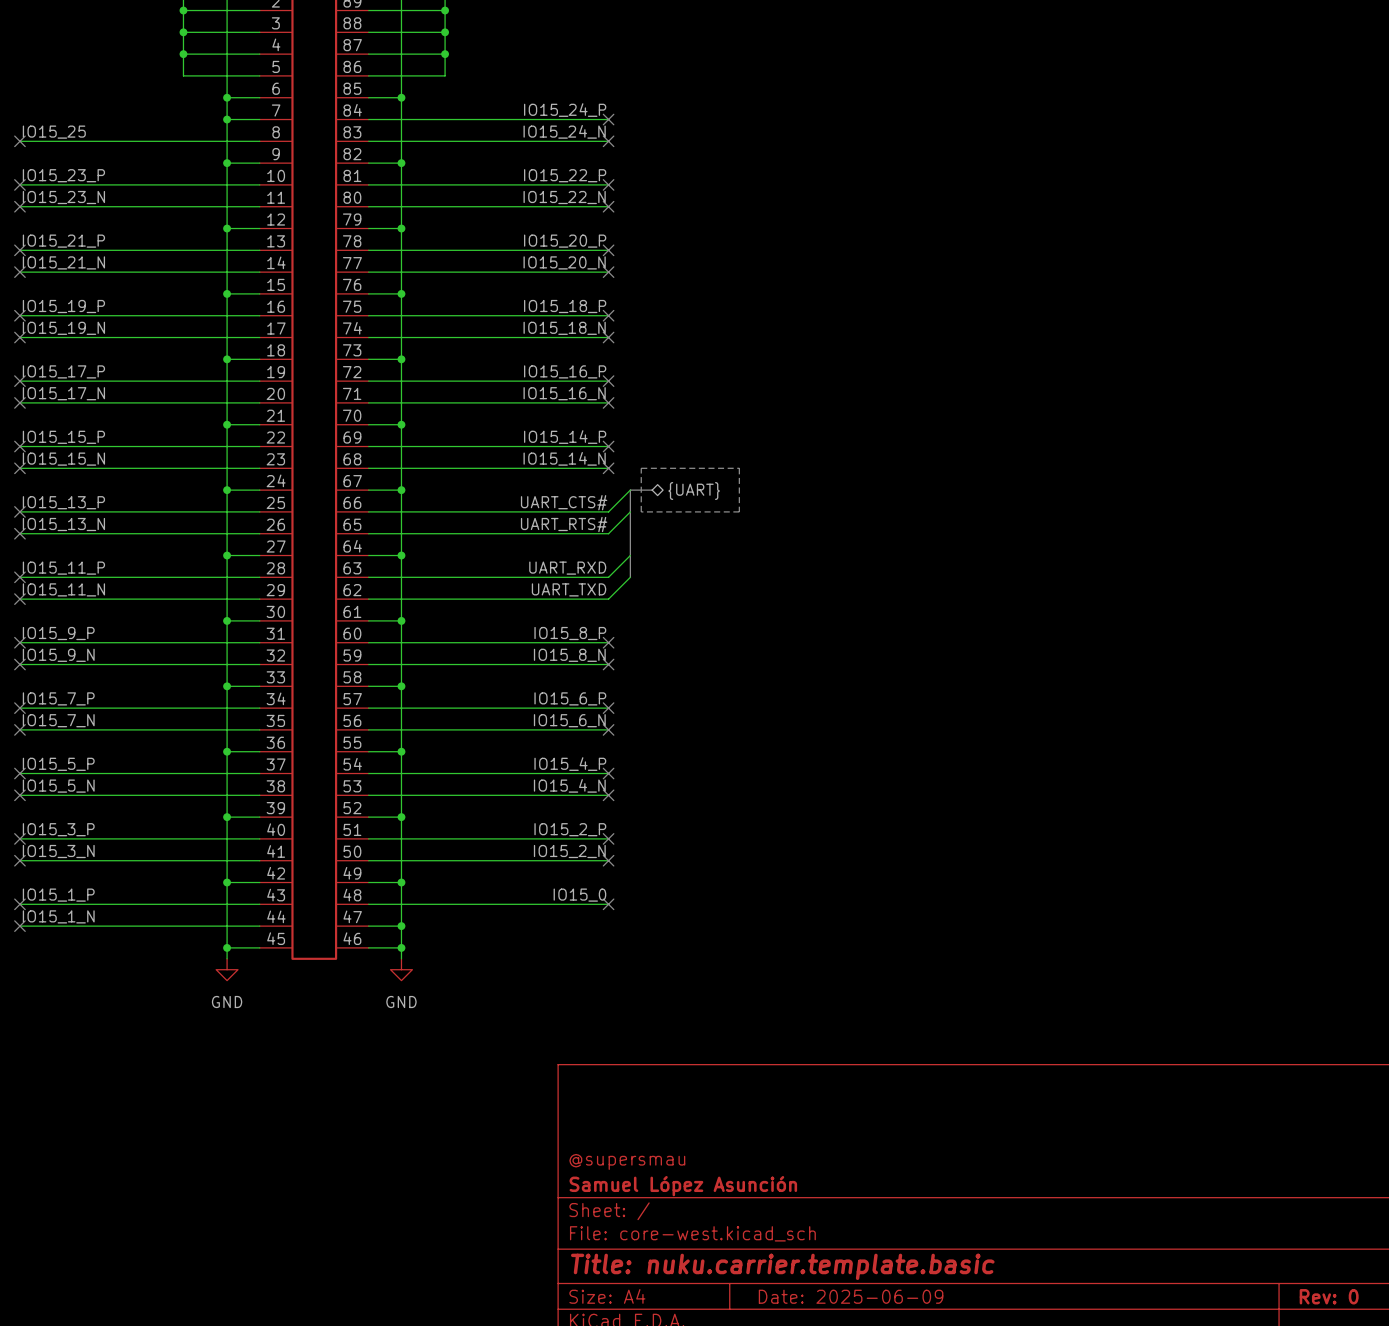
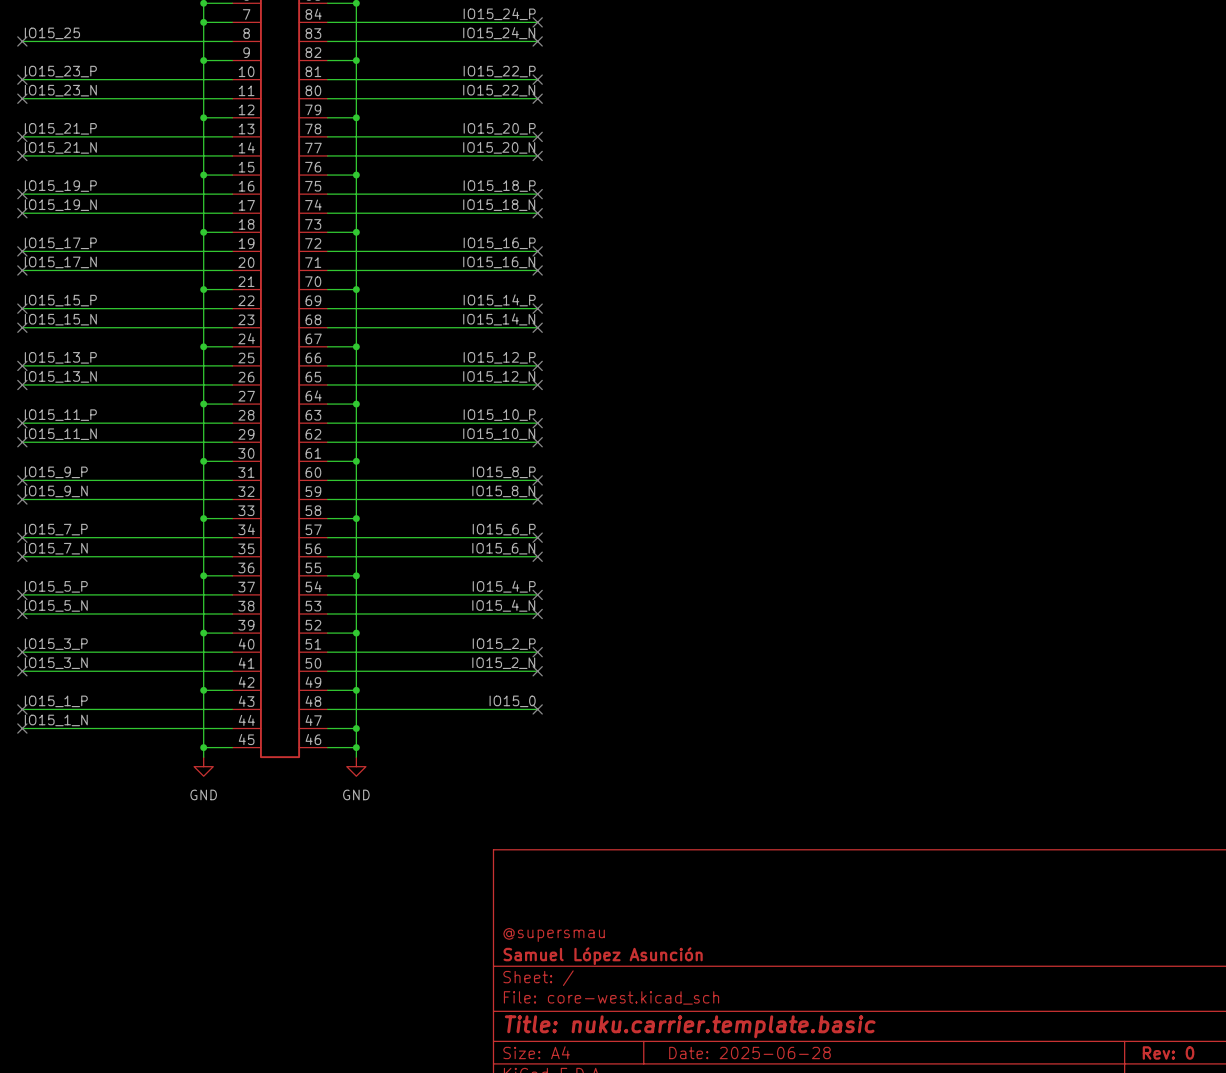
line: (641, 468) (739, 468) (739, 511) (641, 511) (641, 468) -> none
wire: (630, 490) (608, 511) -> none
bus: (652, 490) (630, 490) (630, 577) -> none
hierarchical label: {UART} (694, 491) -> none
label: UART_CTS# (564, 502) -> IO15_12_P (499, 357)
no-connect mark: none -> (537, 365)
wire: (630, 511) (608, 533) -> none
label: UART_RTS# (564, 524) -> IO15_12_N (499, 376)
no-connect mark: none -> (537, 384)
wire: (630, 555) (608, 577) -> none
label: UART_RXD (567, 568) -> IO15_10_P (499, 415)
no-connect mark: none -> (537, 423)
wire: (630, 577) (608, 599) -> none
label: UART_TXD (569, 589) -> IO15_10_N (499, 434)
no-connect mark: none -> (537, 442)
title block: Date: 2025-06-09 (851, 1296) -> Date: 2025-06-28 (749, 1052)

